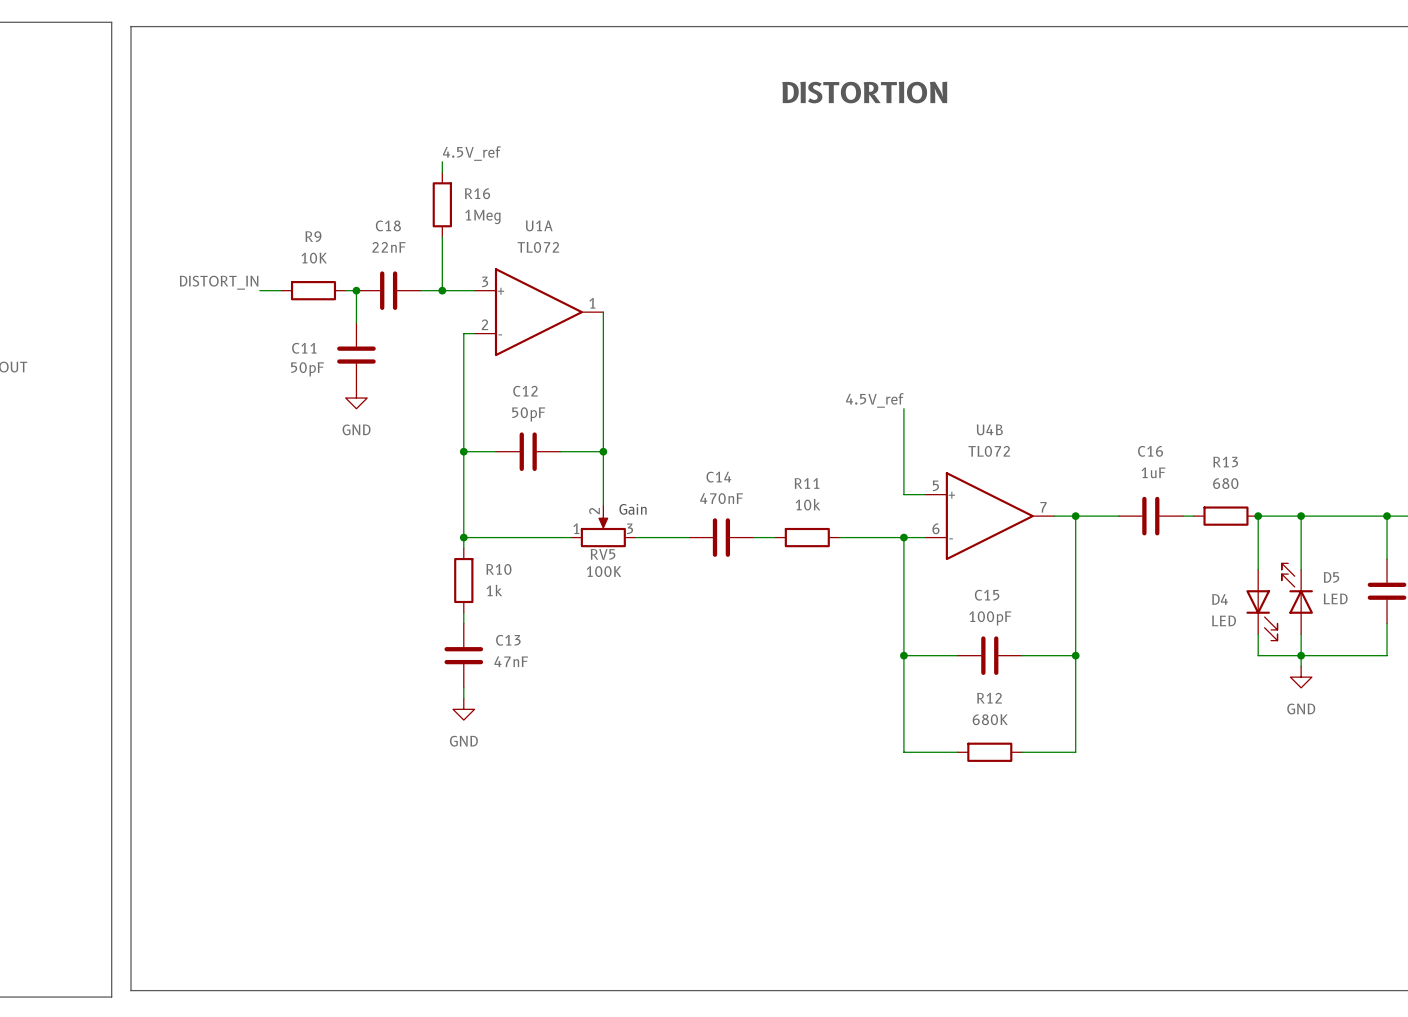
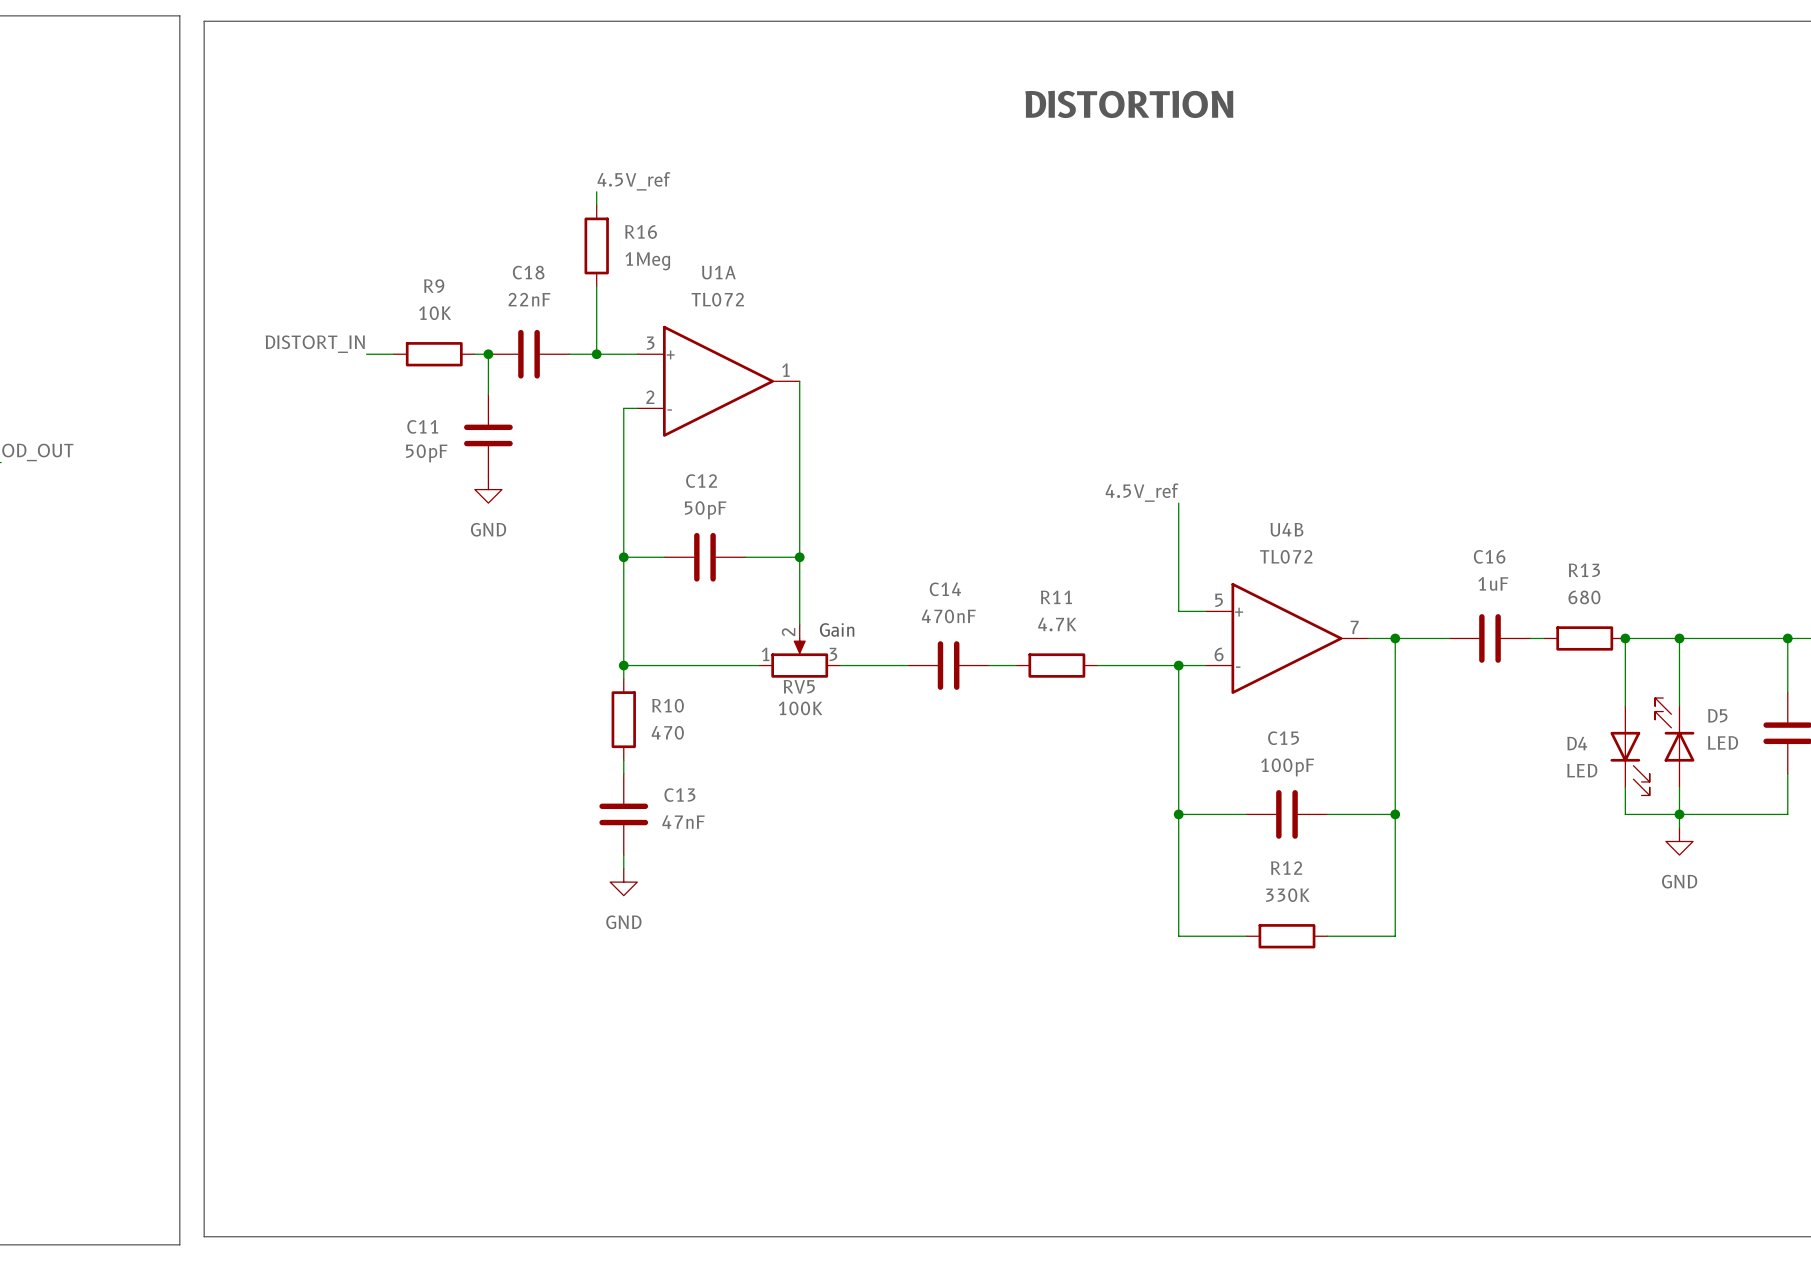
R11 value: 10k (808, 504) -> 4.7K (1057, 624)
R10 value: 1k (494, 590) -> 470 (667, 732)
R12 value: 680K (990, 719) -> 330K (1287, 895)

